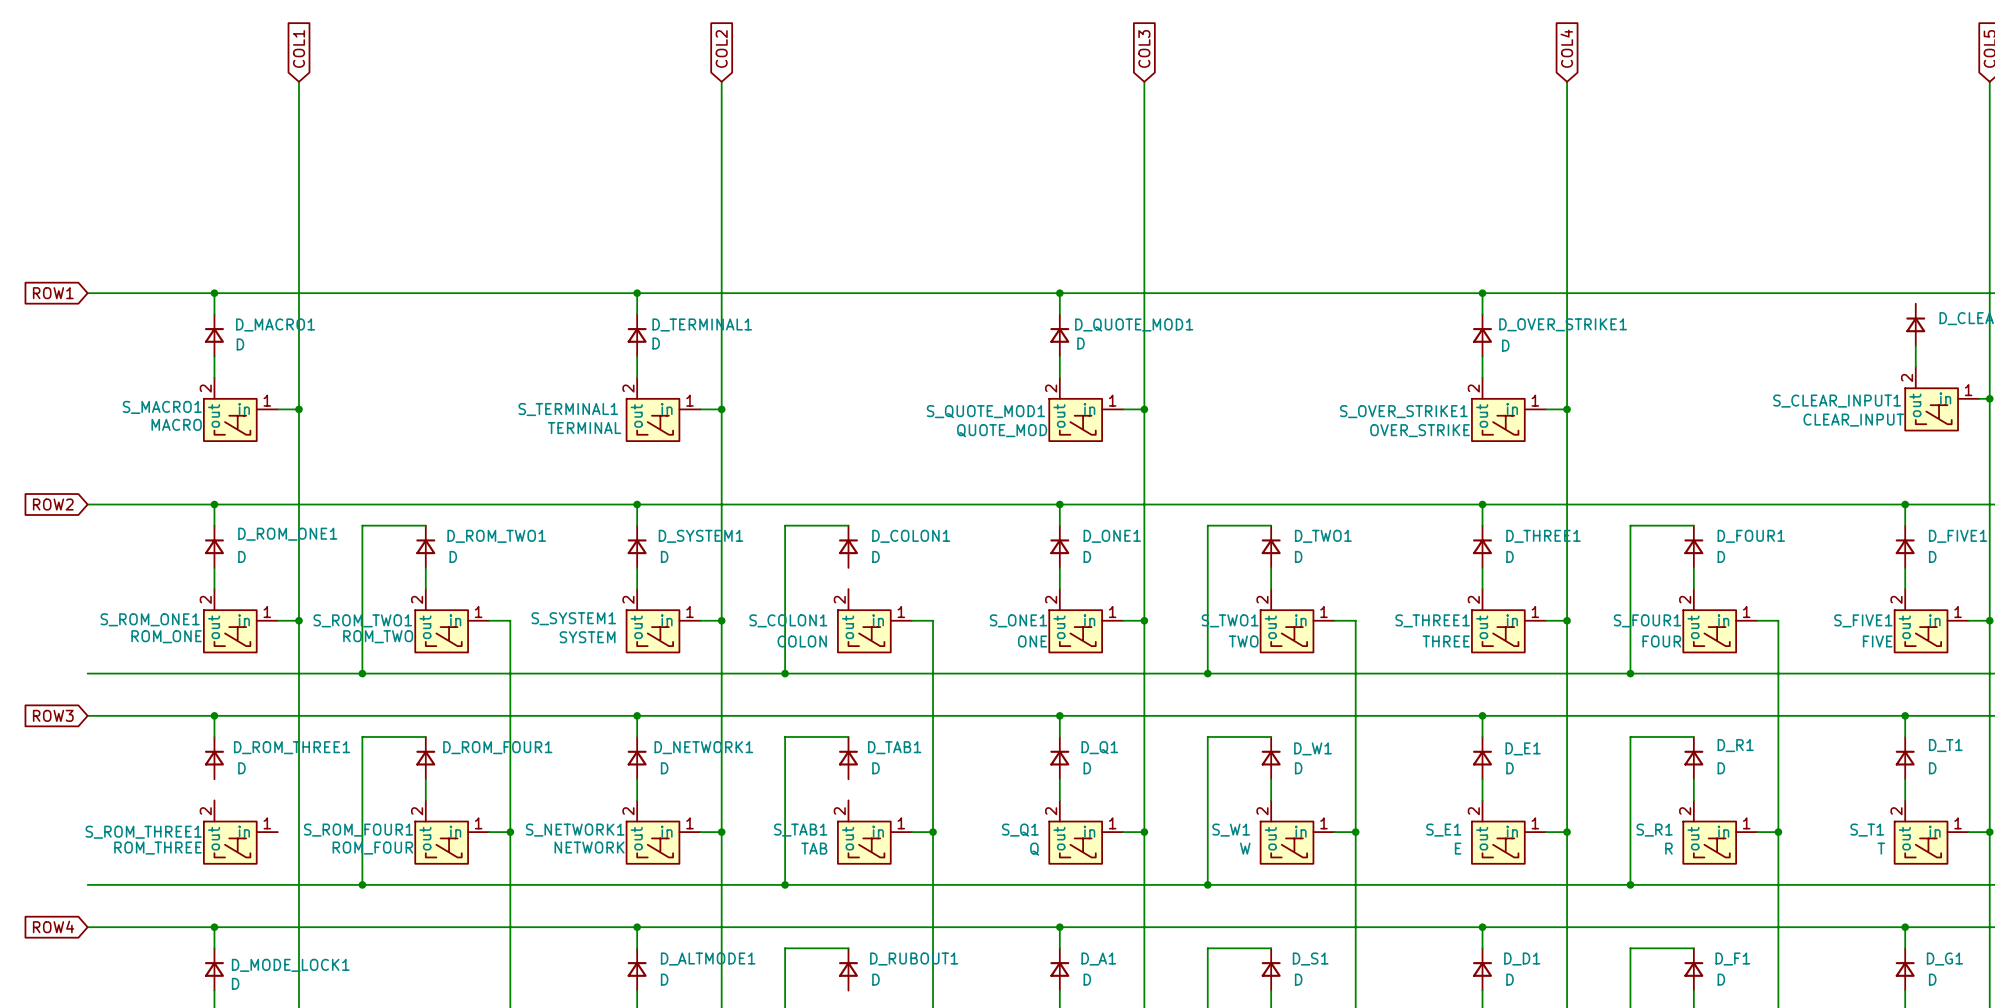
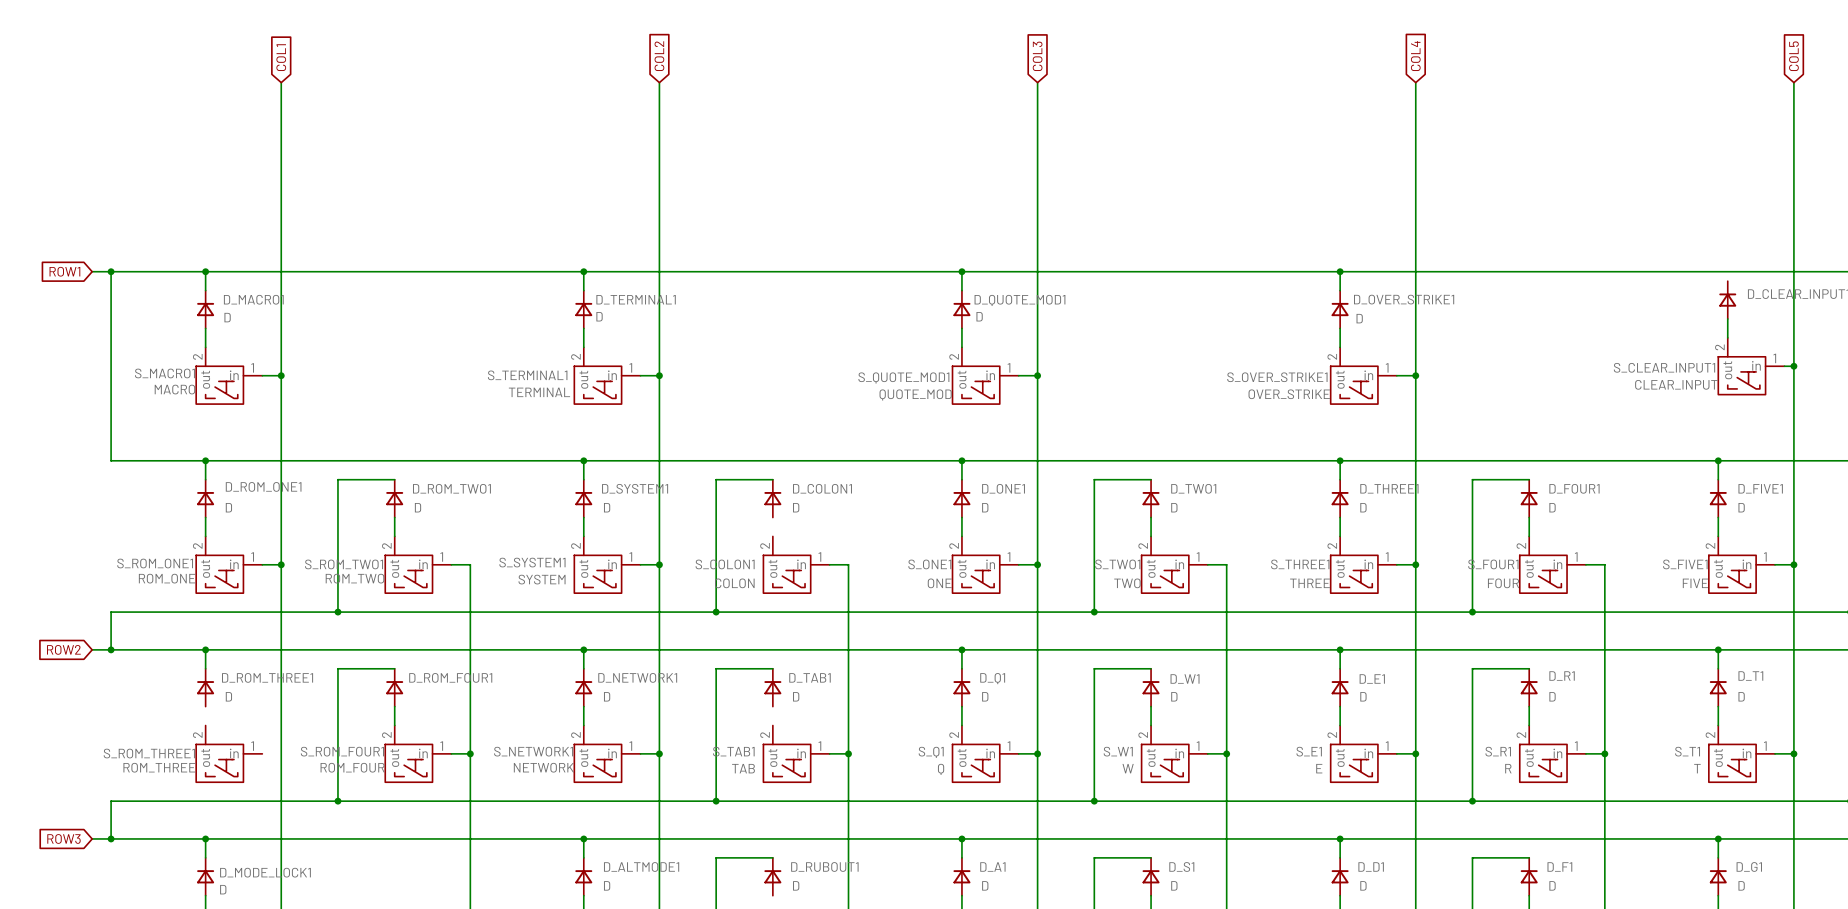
junction: none -> (111, 271)
global label: ROW2 (53, 504) -> none
wire: (87, 504) (108, 504) -> (111, 271) (111, 460)
wire: (87, 673) (108, 673) -> (111, 649) (111, 612)
global label: ROW3 (53, 715) -> ROW2 (63, 649)
junction: none -> (111, 649)
wire: (87, 884) (108, 884) -> (111, 838) (111, 801)
global label: ROW4 (53, 926) -> ROW3 (63, 838)
junction: none -> (111, 838)

